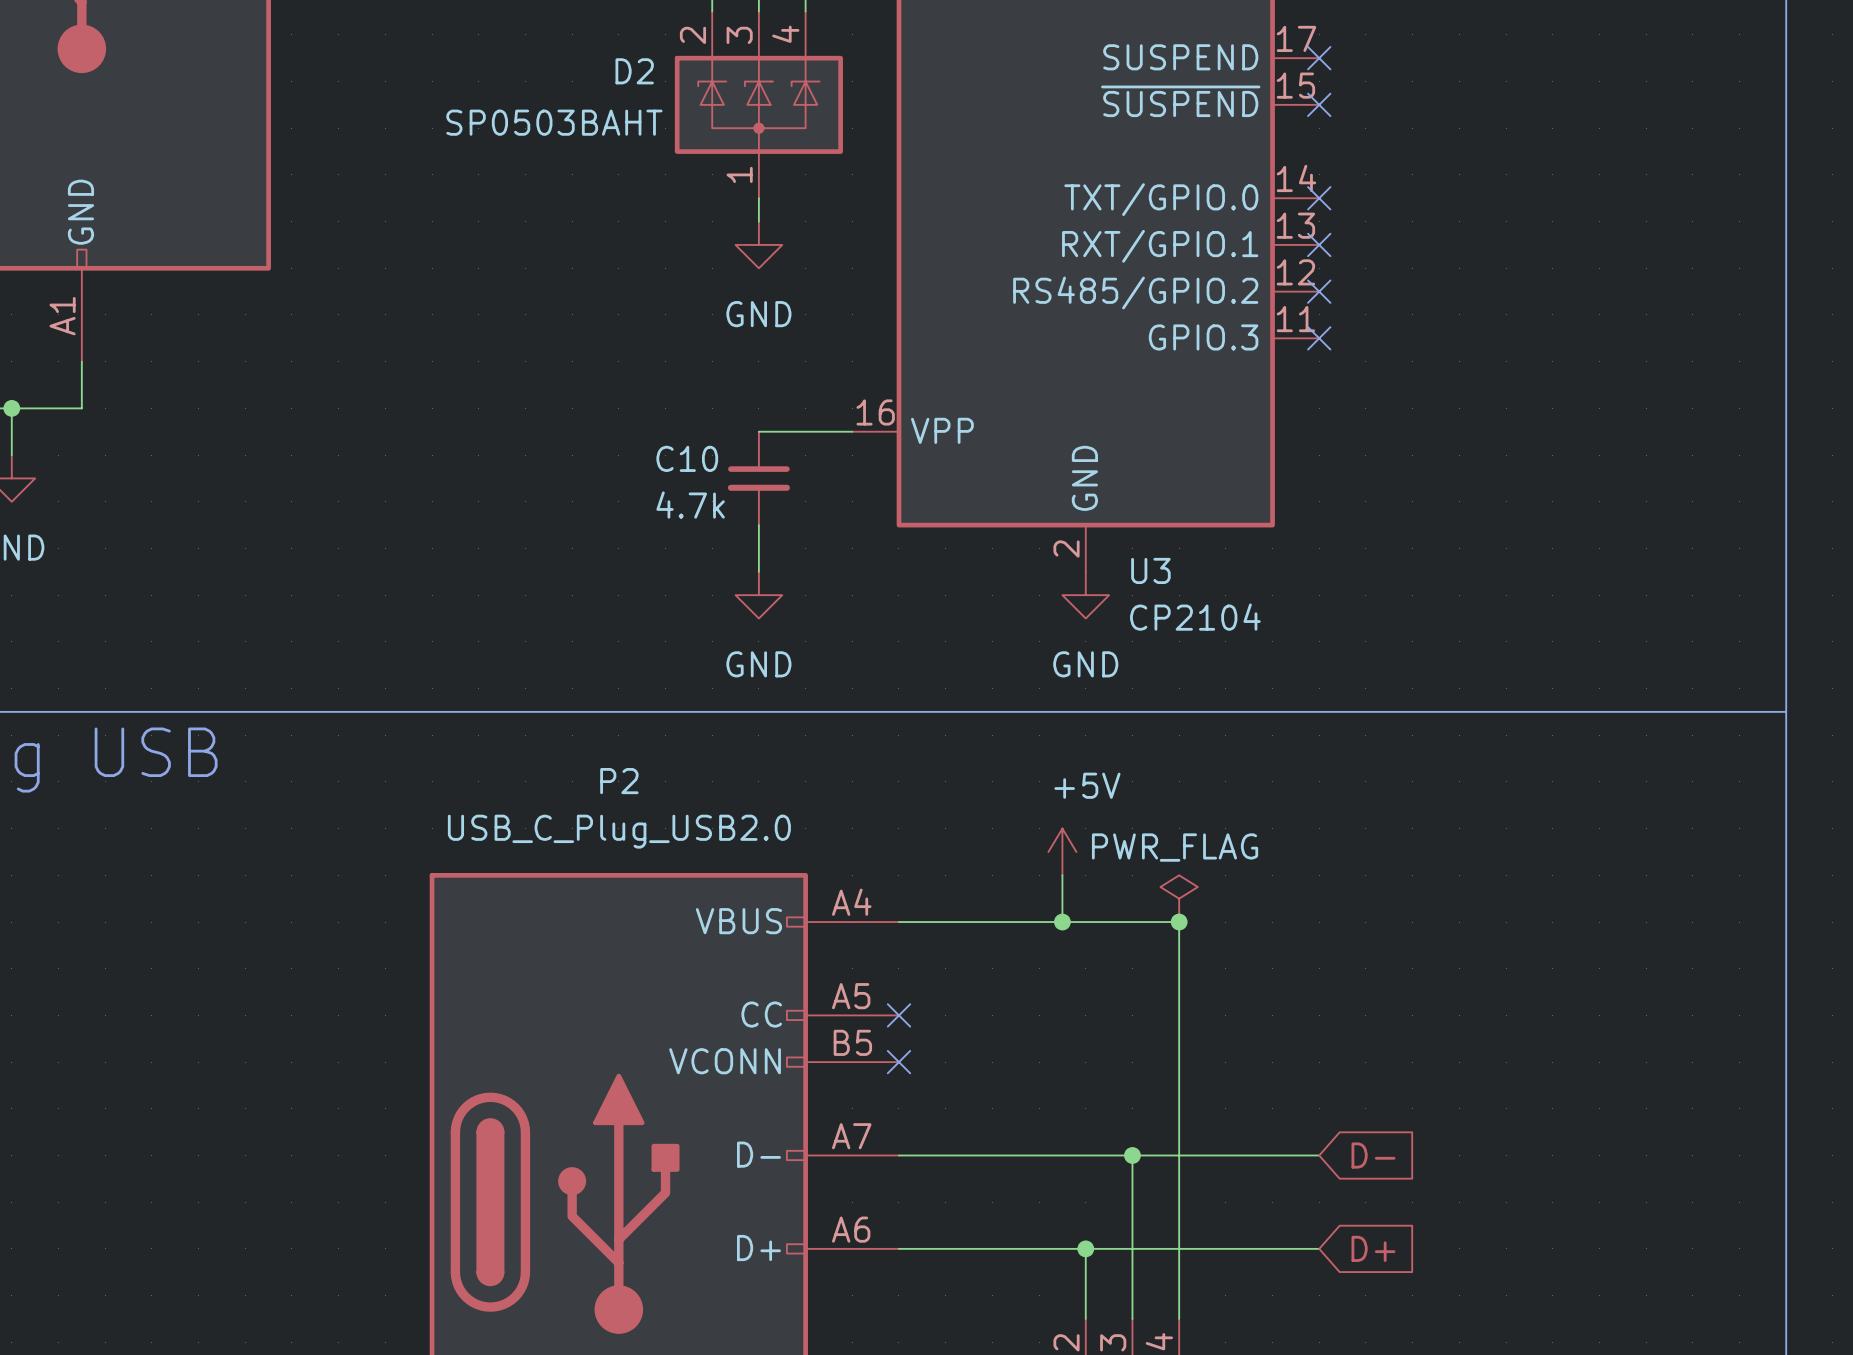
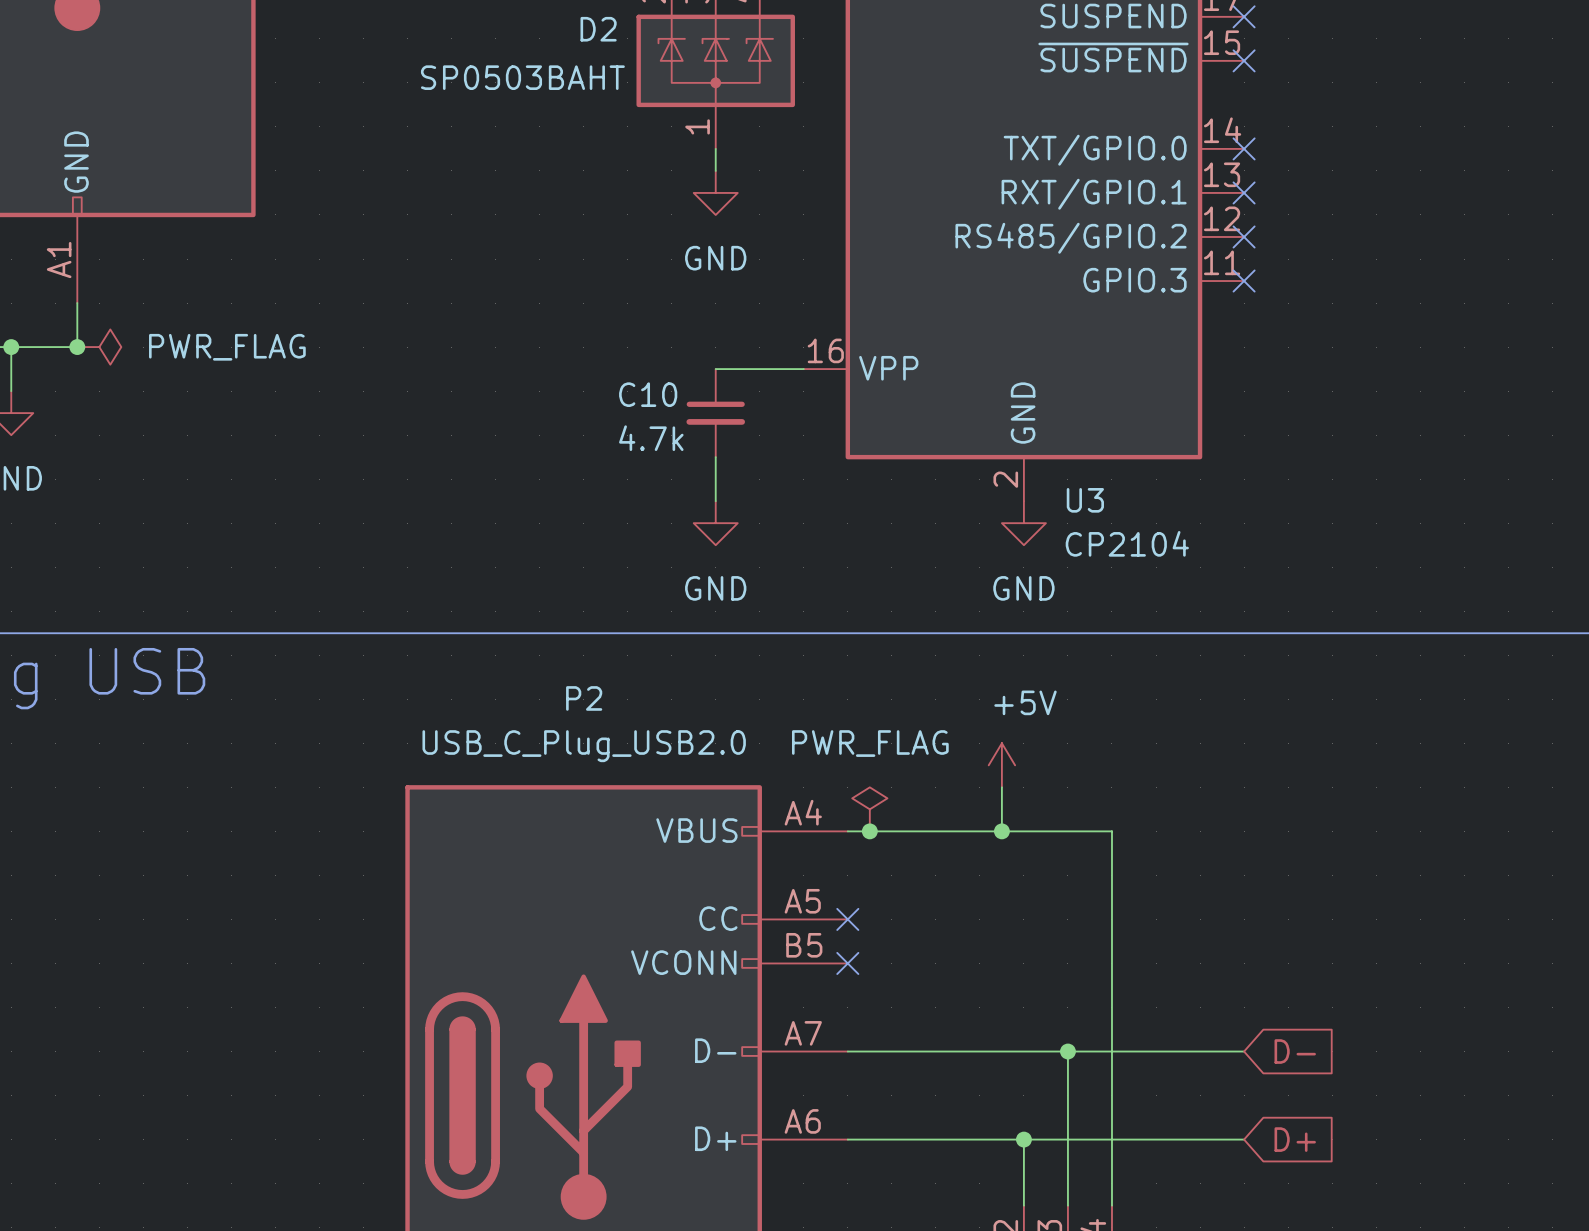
junction: none -> (77, 347)
power symbol: none -> PWR_FLAG (99, 347)
power symbol text position: PWR_FLAG (1175, 847) -> PWR_FLAG (870, 743)
power symbol position: PWR_FLAG (1179, 898) -> PWR_FLAG (869, 809)
junction: none -> (869, 831)
junction: (1179, 922) -> none

